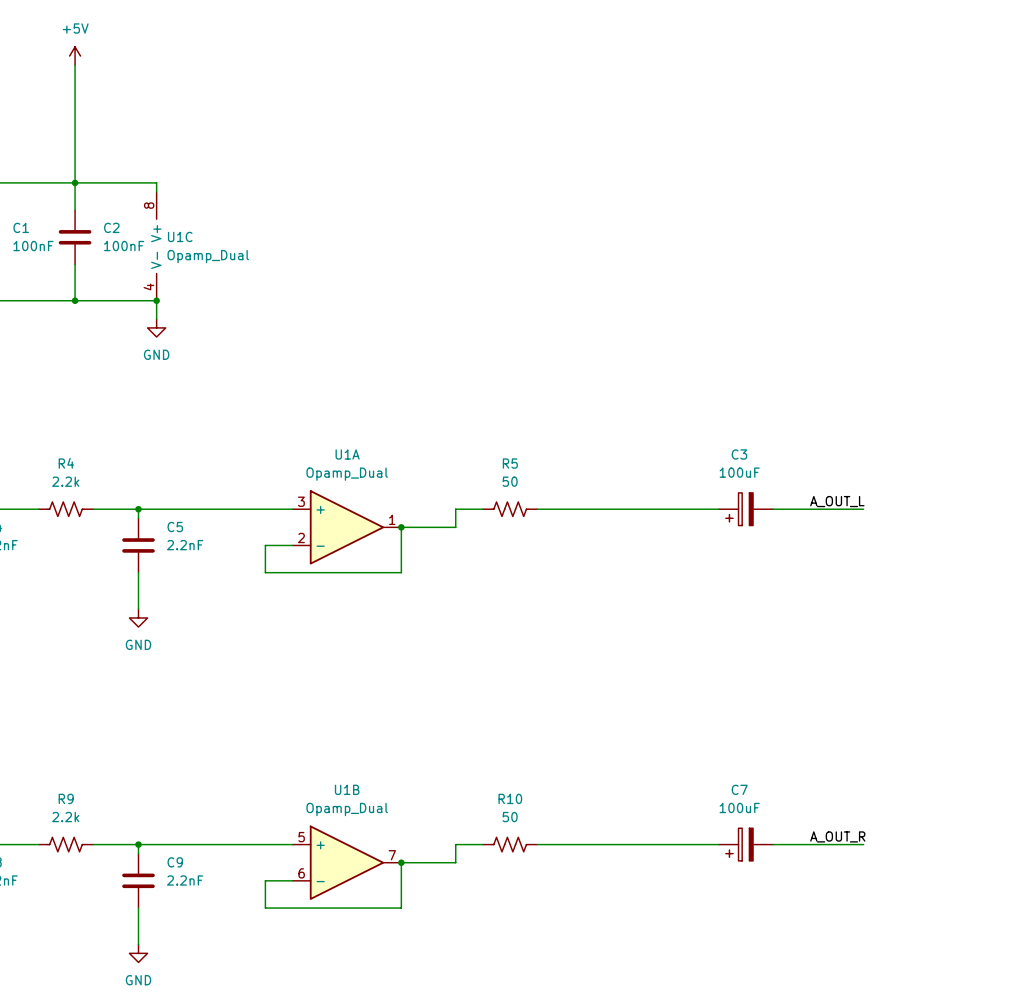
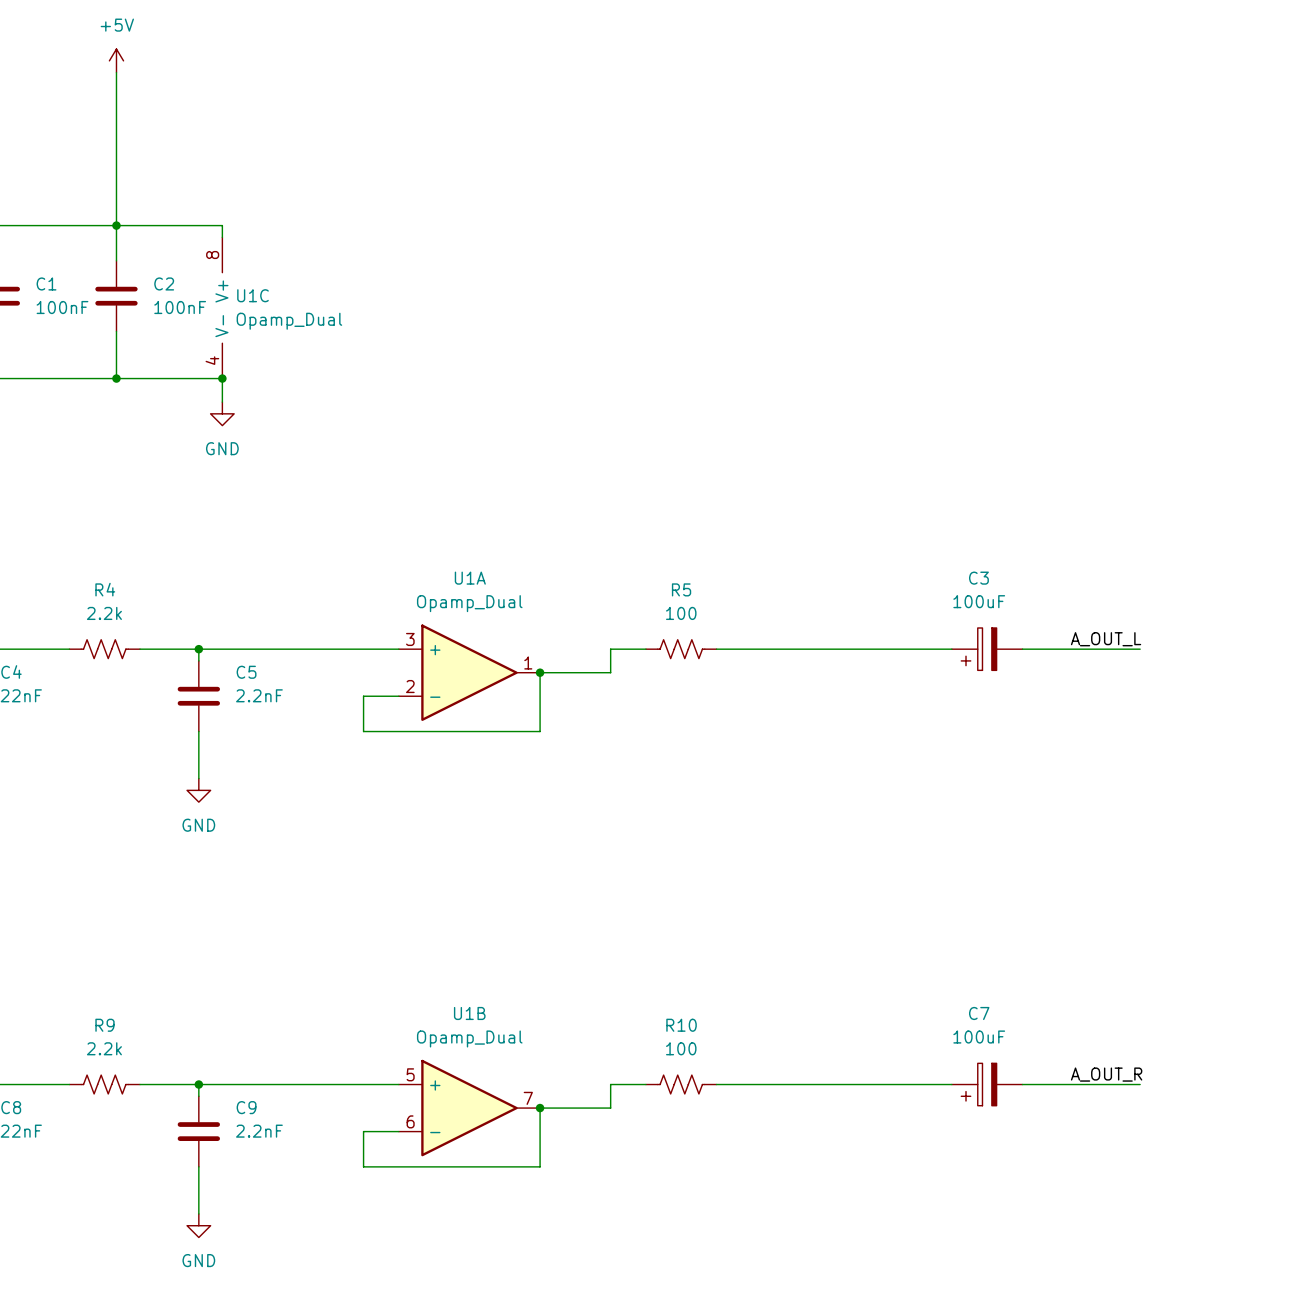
R5 value: 50 (510, 481) -> 100 (681, 613)
R10 value: 50 (510, 817) -> 100 (681, 1048)

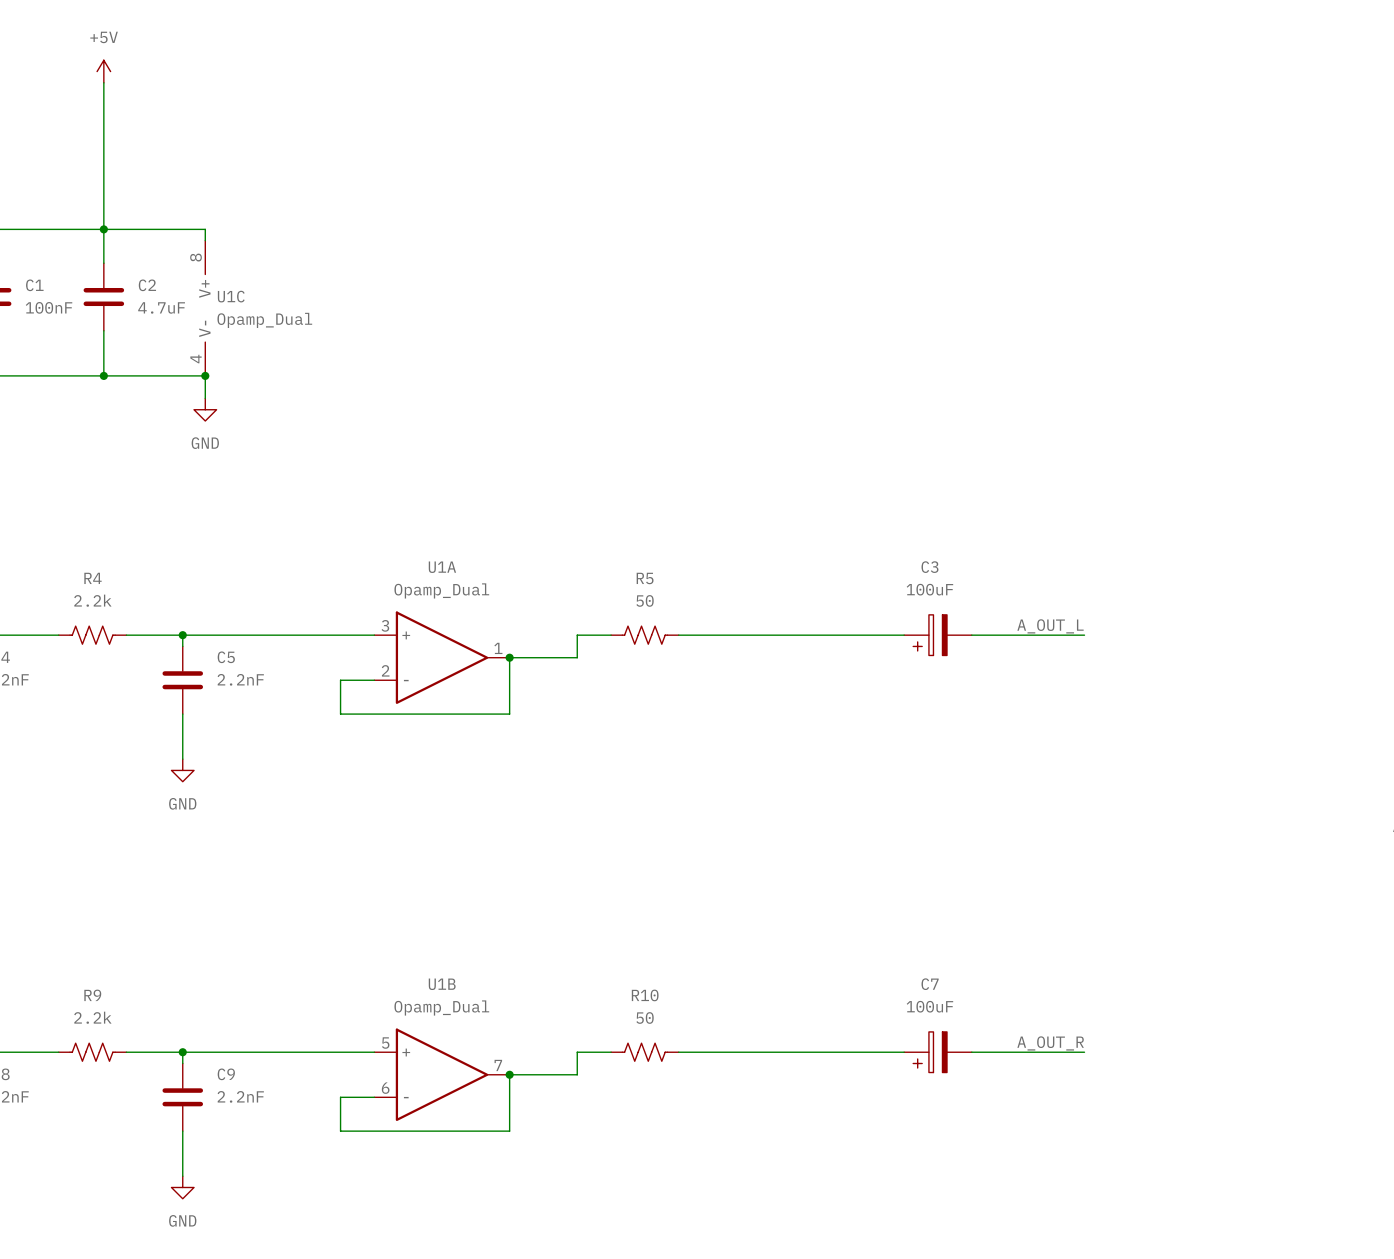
C2 value: 100nF (180, 307) -> 4.7uF (161, 307)
R5 value: 100 (681, 613) -> 50 (645, 600)
R10 value: 100 (681, 1048) -> 50 (645, 1017)

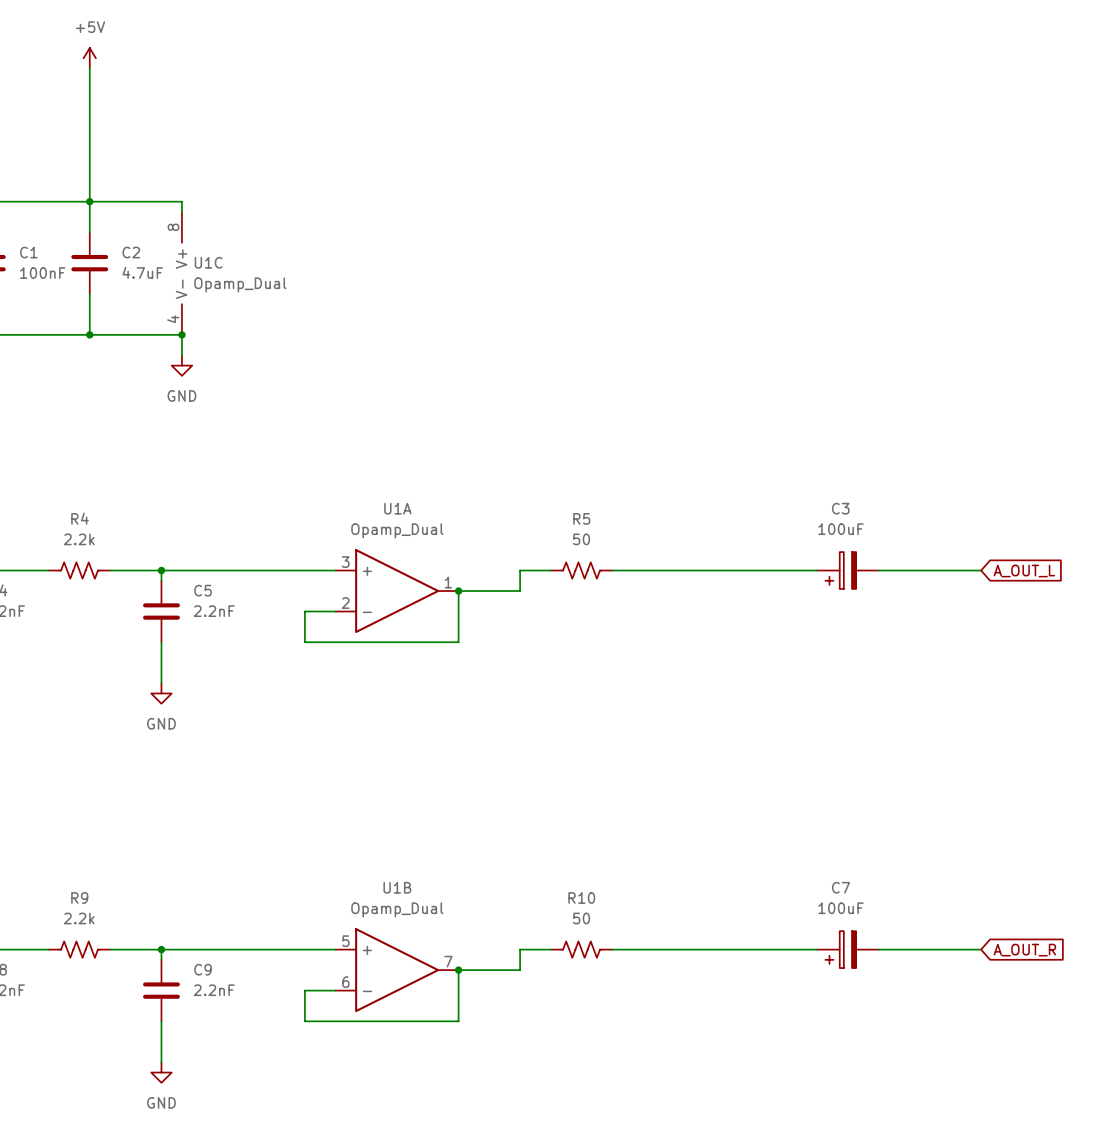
label: A_OUT_L (1050, 626) -> none
global label: none -> A_OUT_L (1024, 571)
label: A_OUT_R (1050, 1043) -> none
global label: none -> A_OUT_R (1024, 950)

